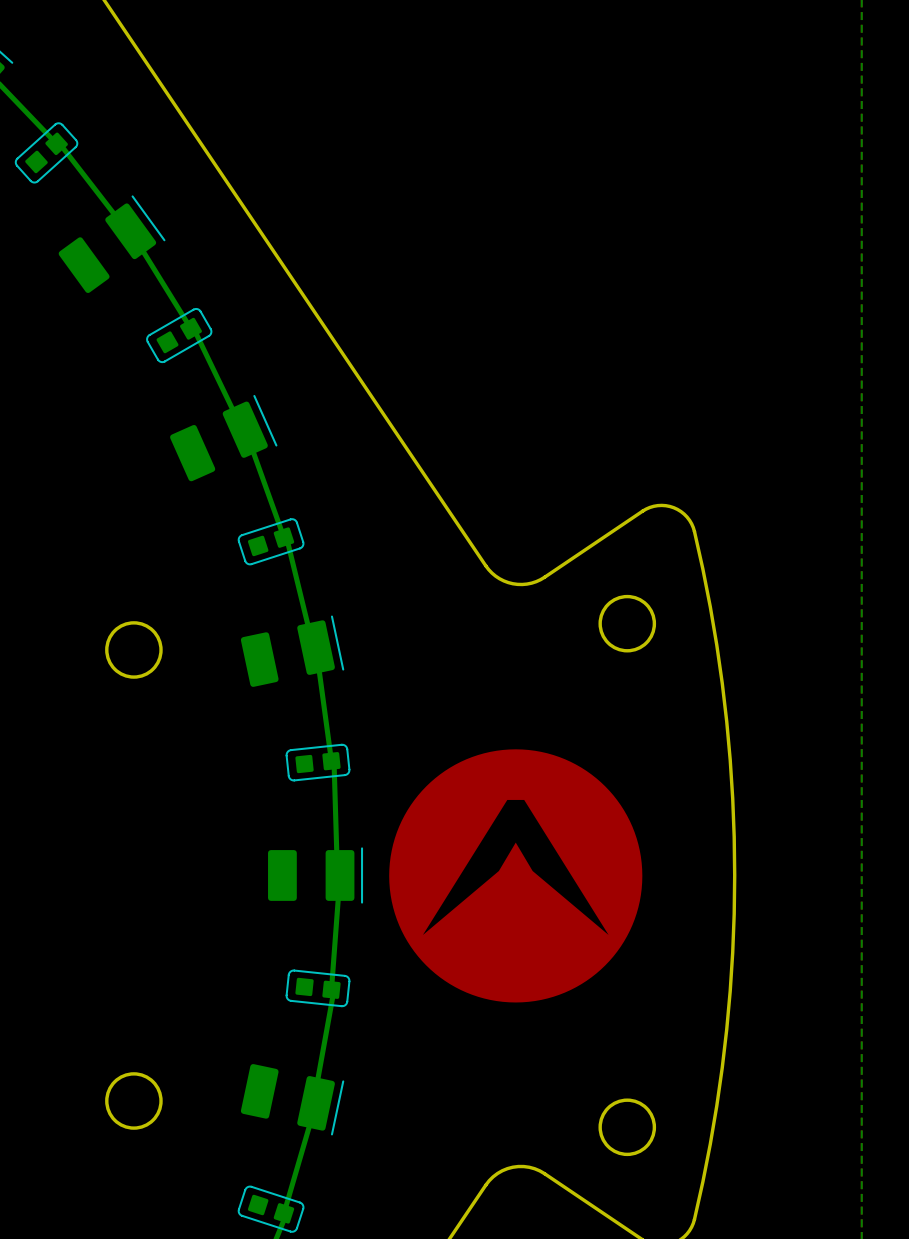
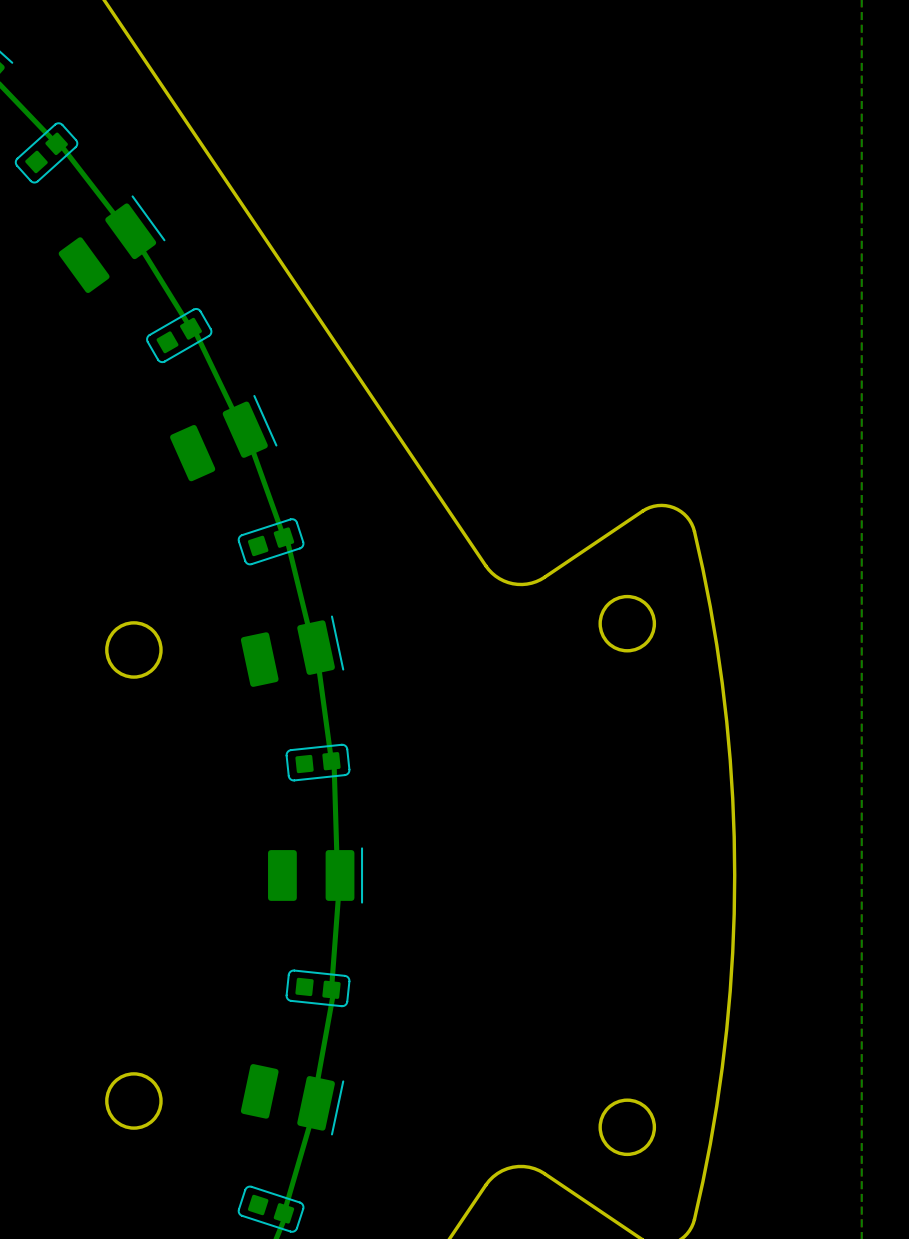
part: (515, 875) -> none

